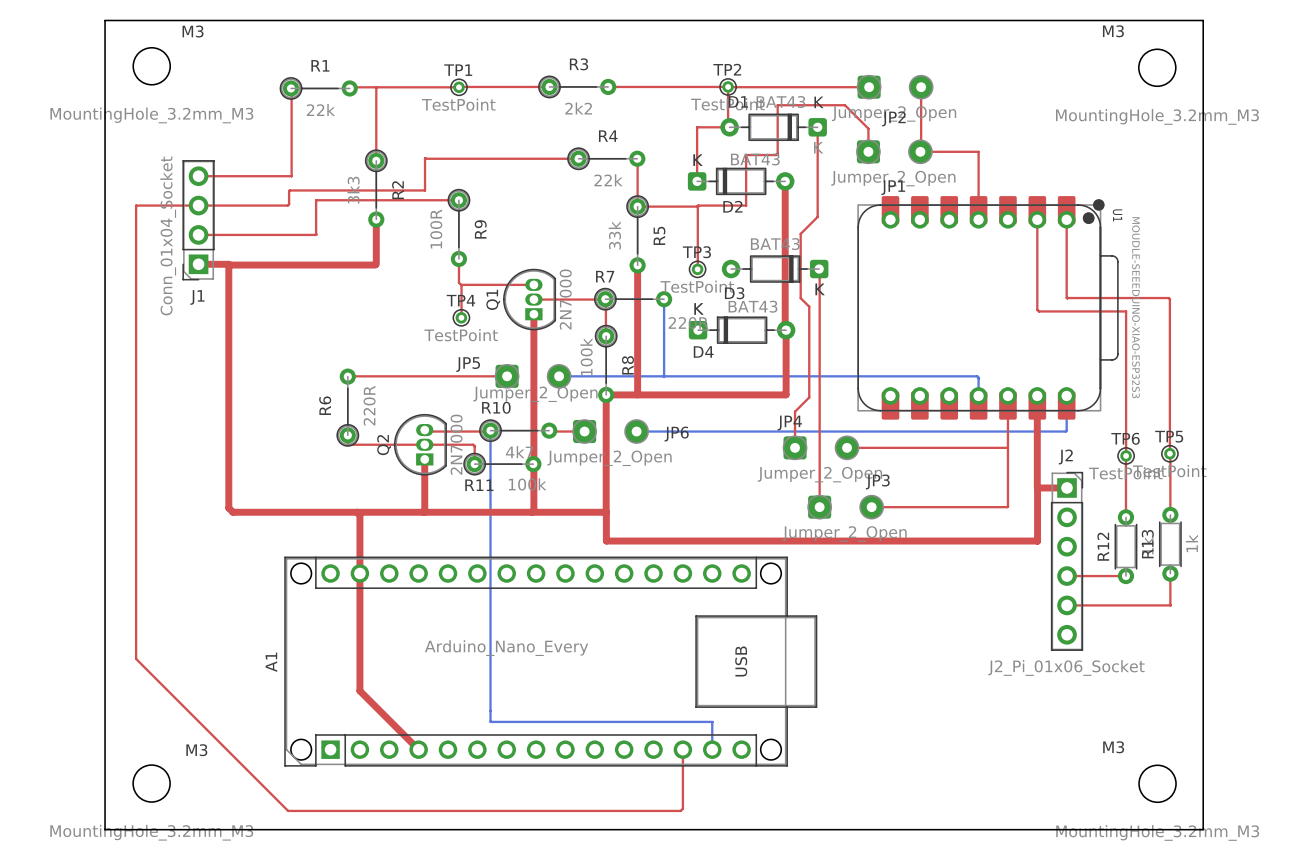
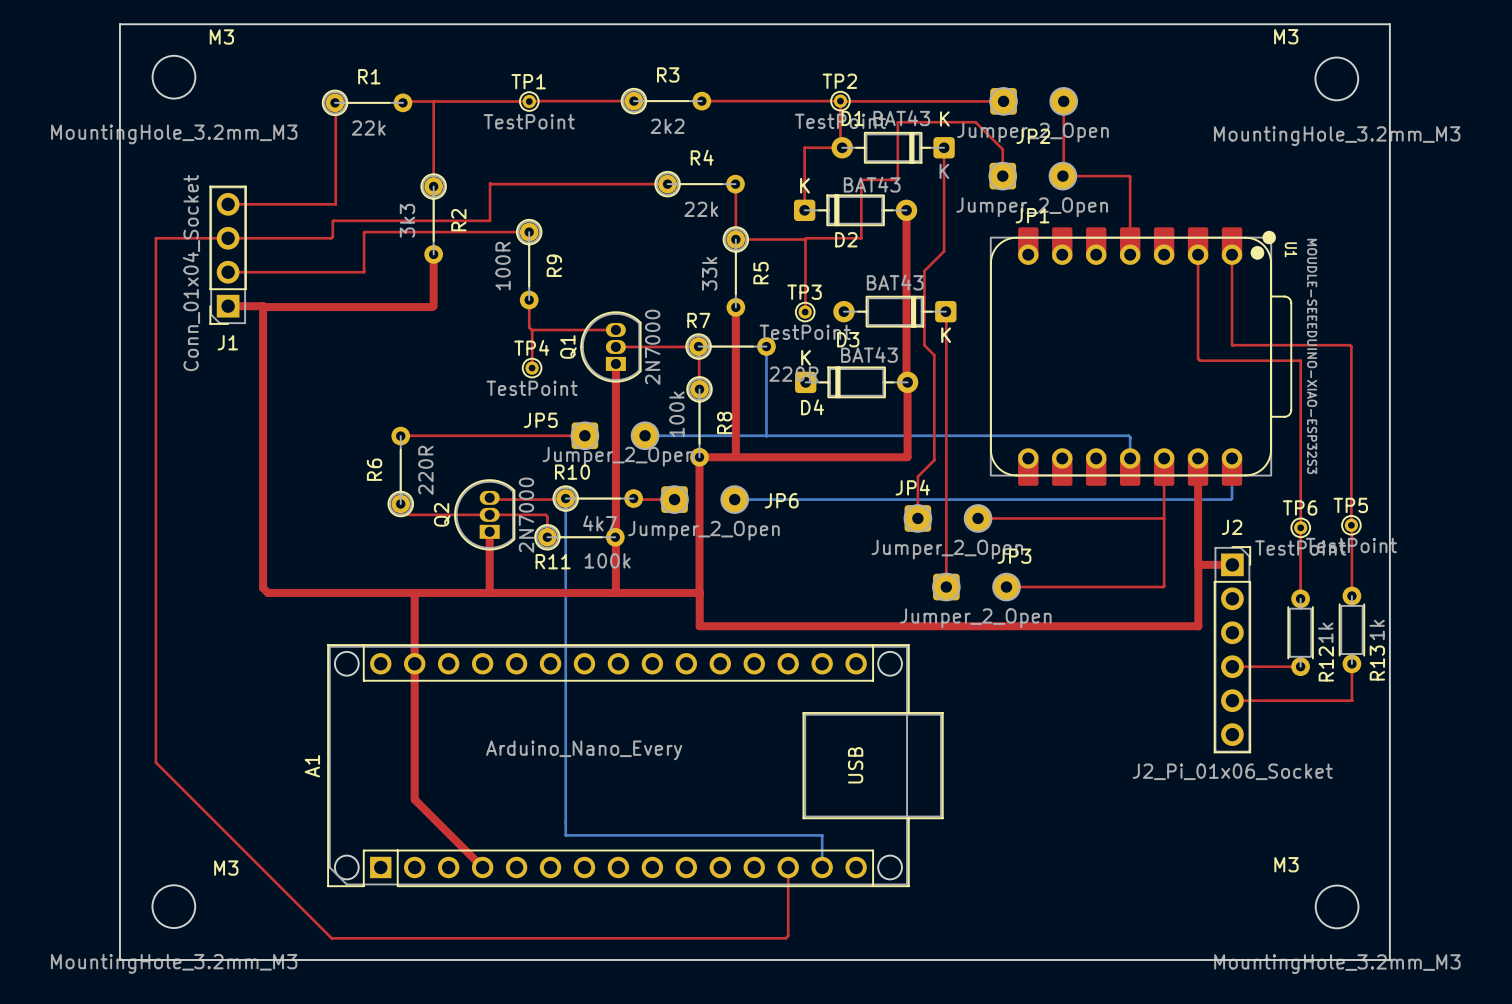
R13 name position: R13 (1147, 544) -> R13 (1377, 663)
R12 name position: R12 (1103, 546) -> R12 (1326, 663)

